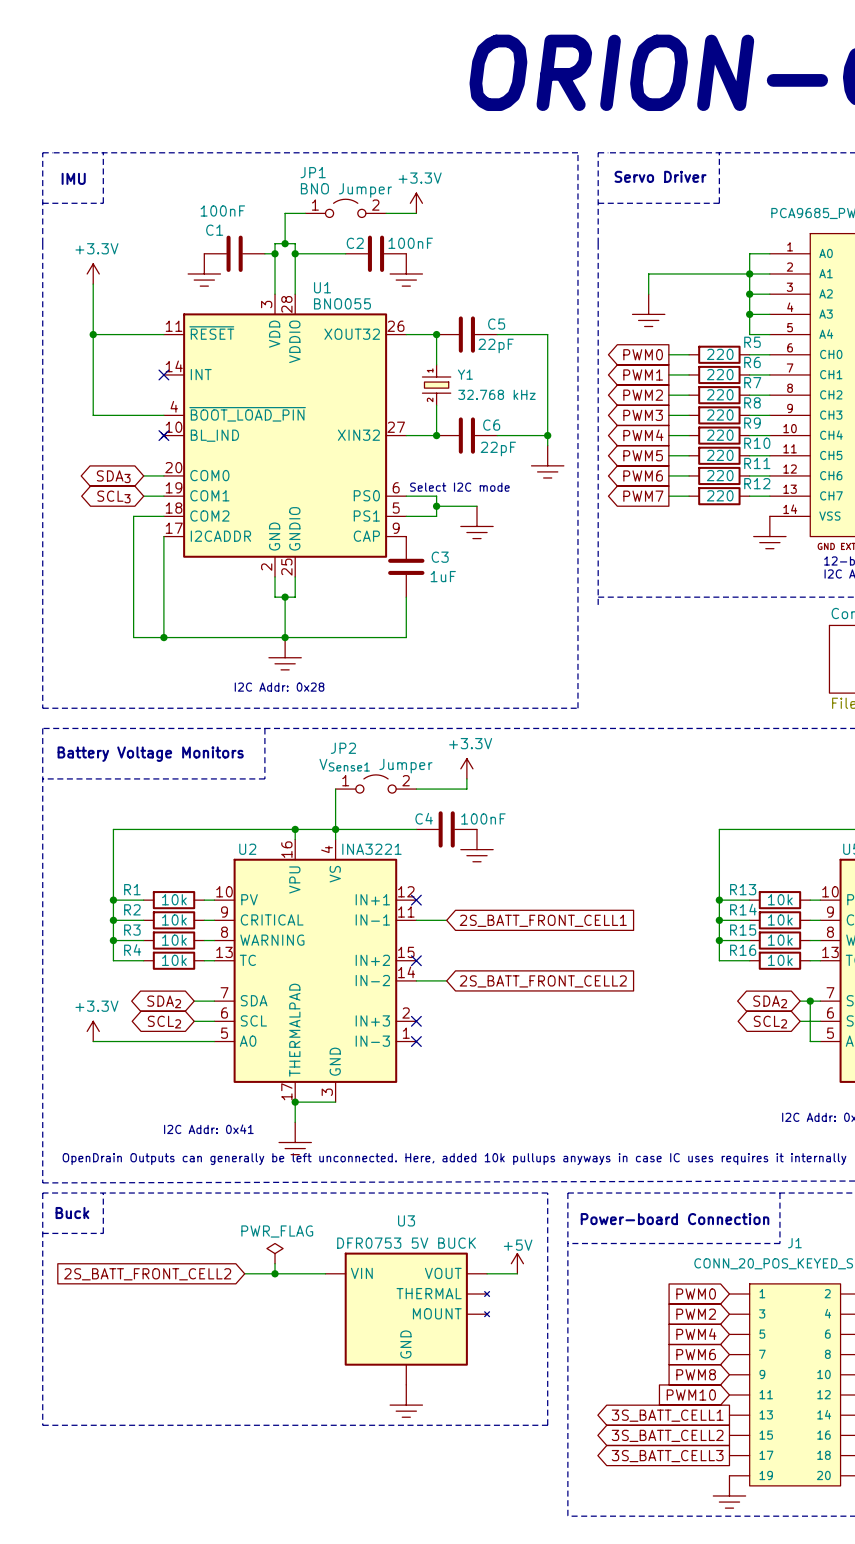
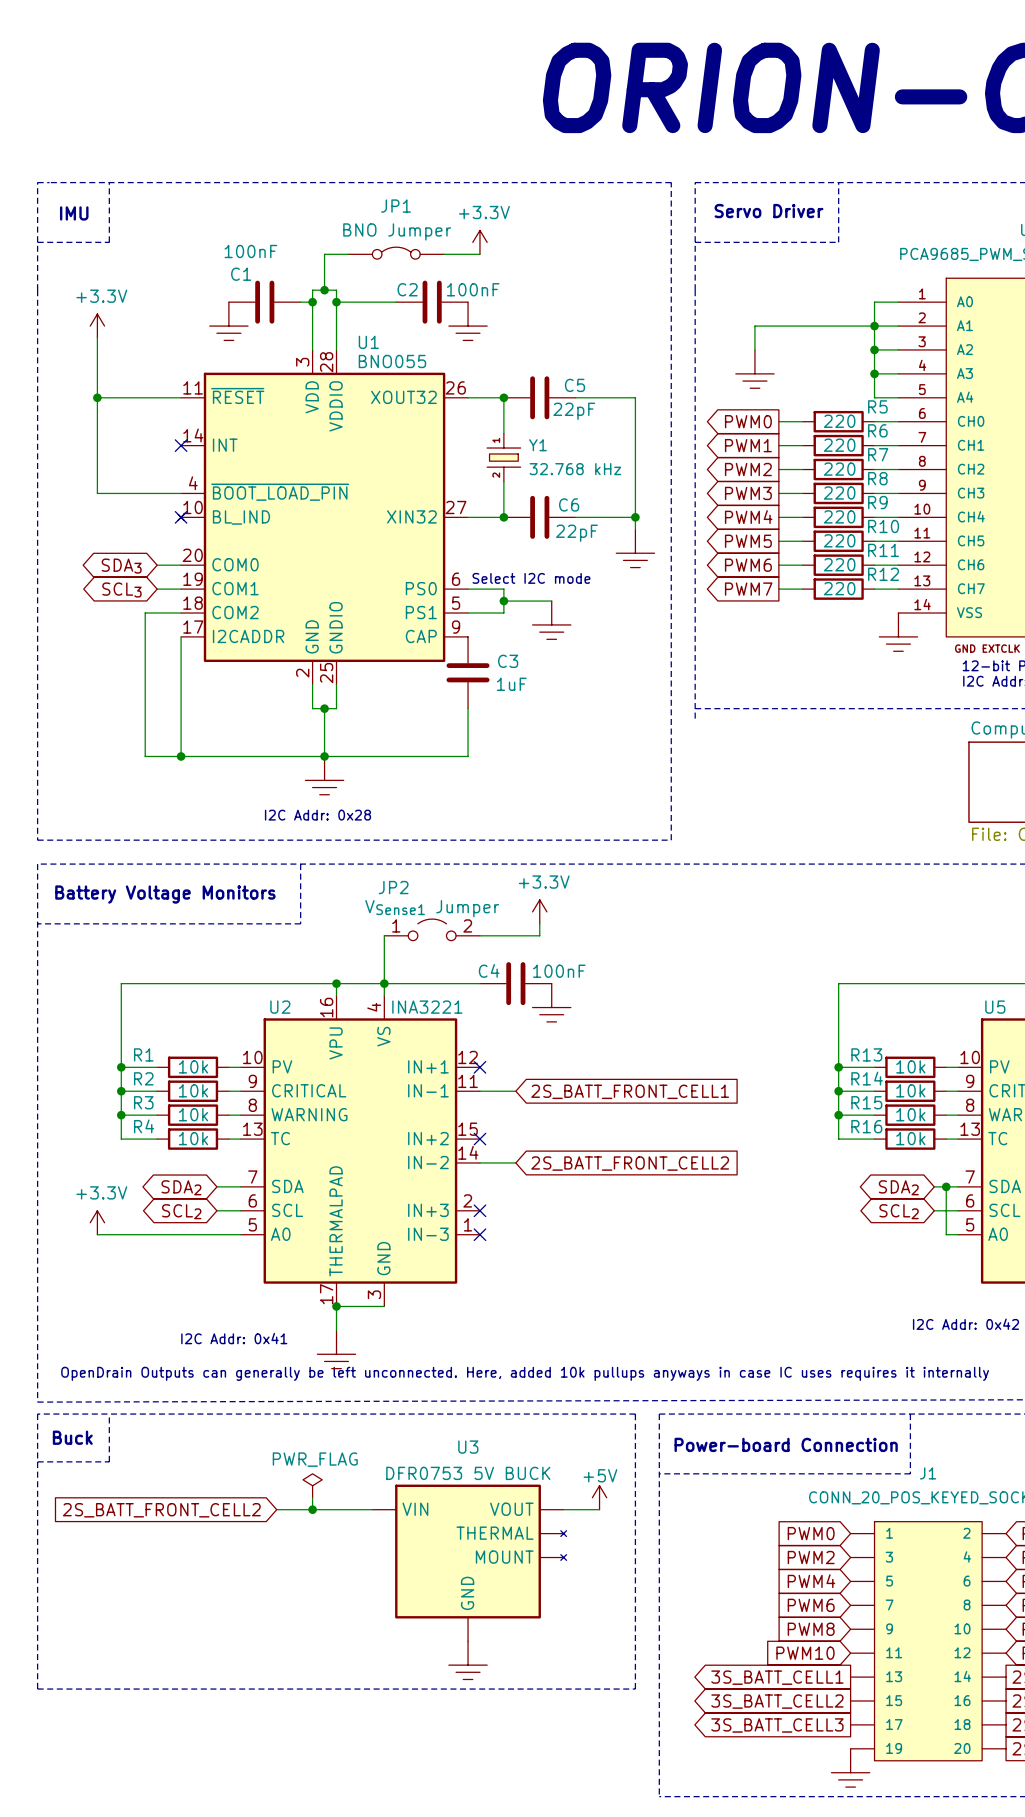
JP1 name position: JP1 (313, 172) -> JP1 (396, 206)
JP1 symbol: [305, 199, 387, 218] -> [348, 247, 445, 260]

